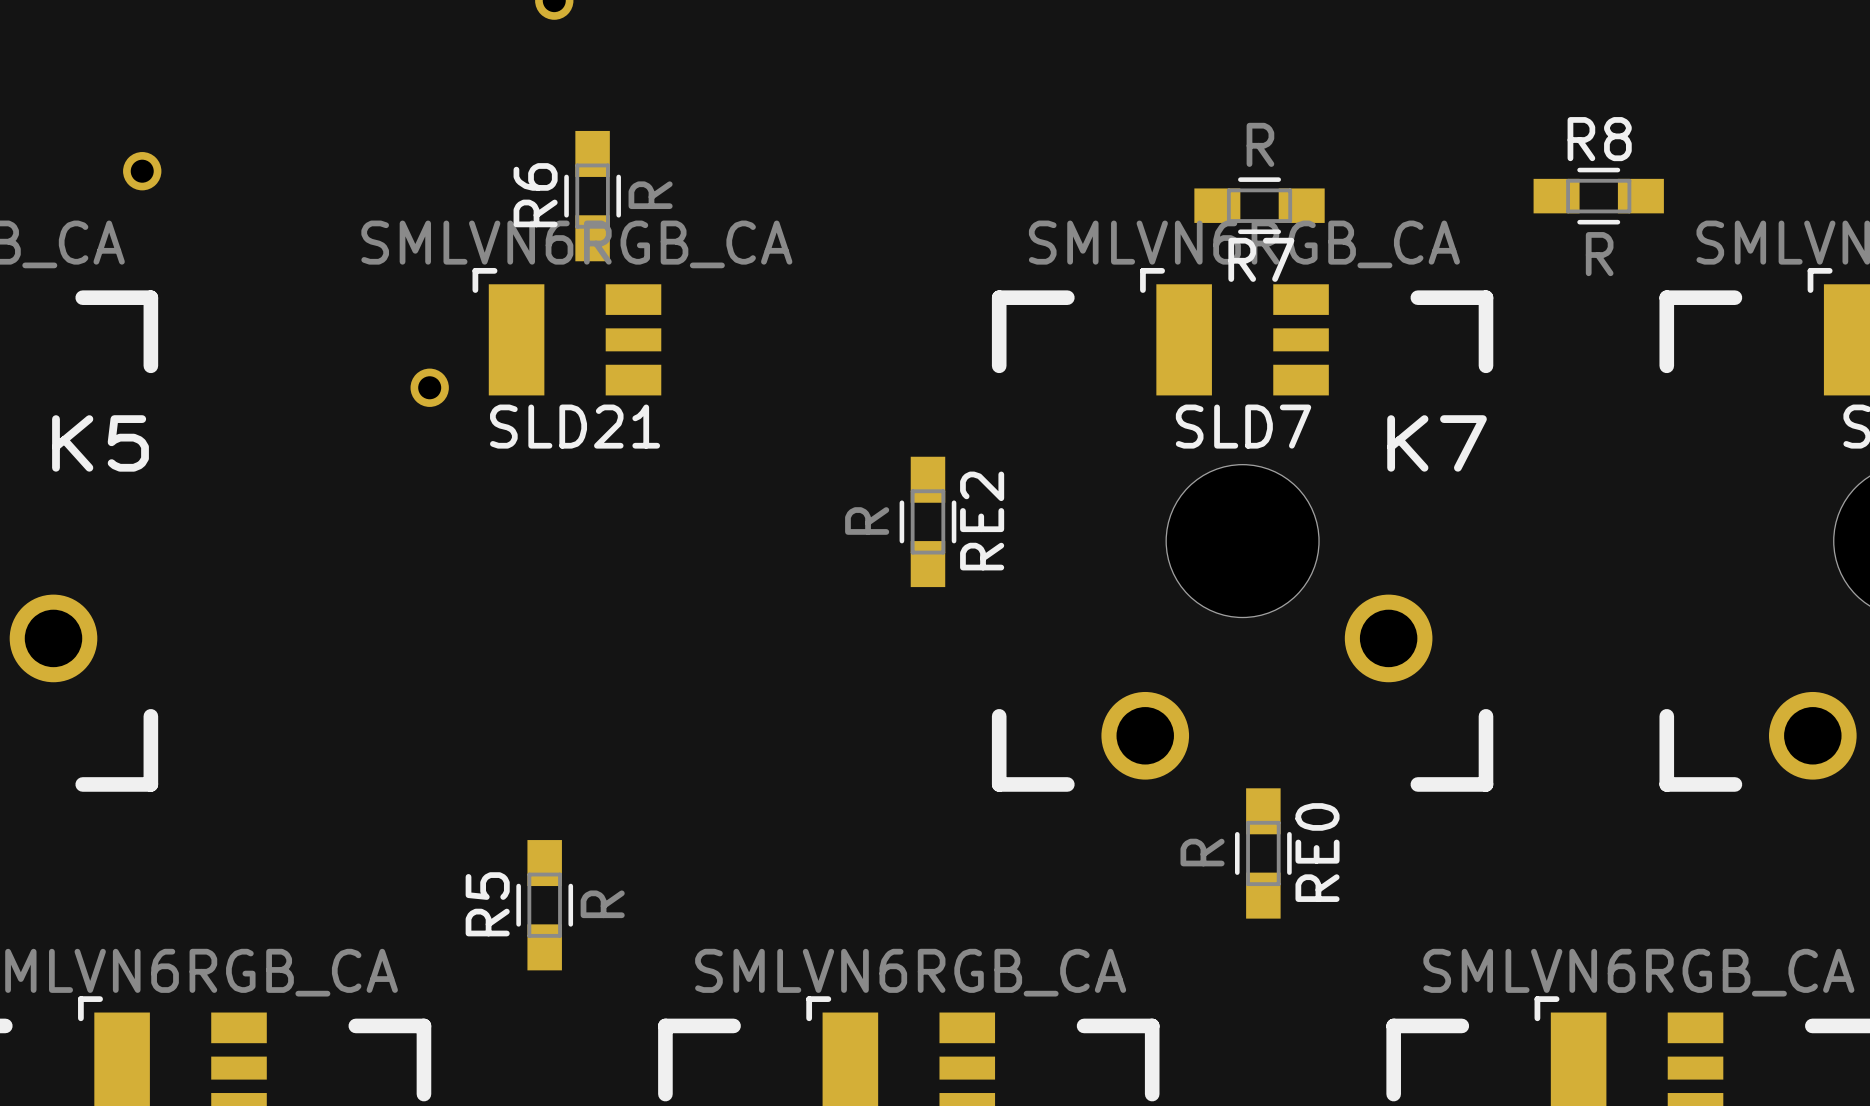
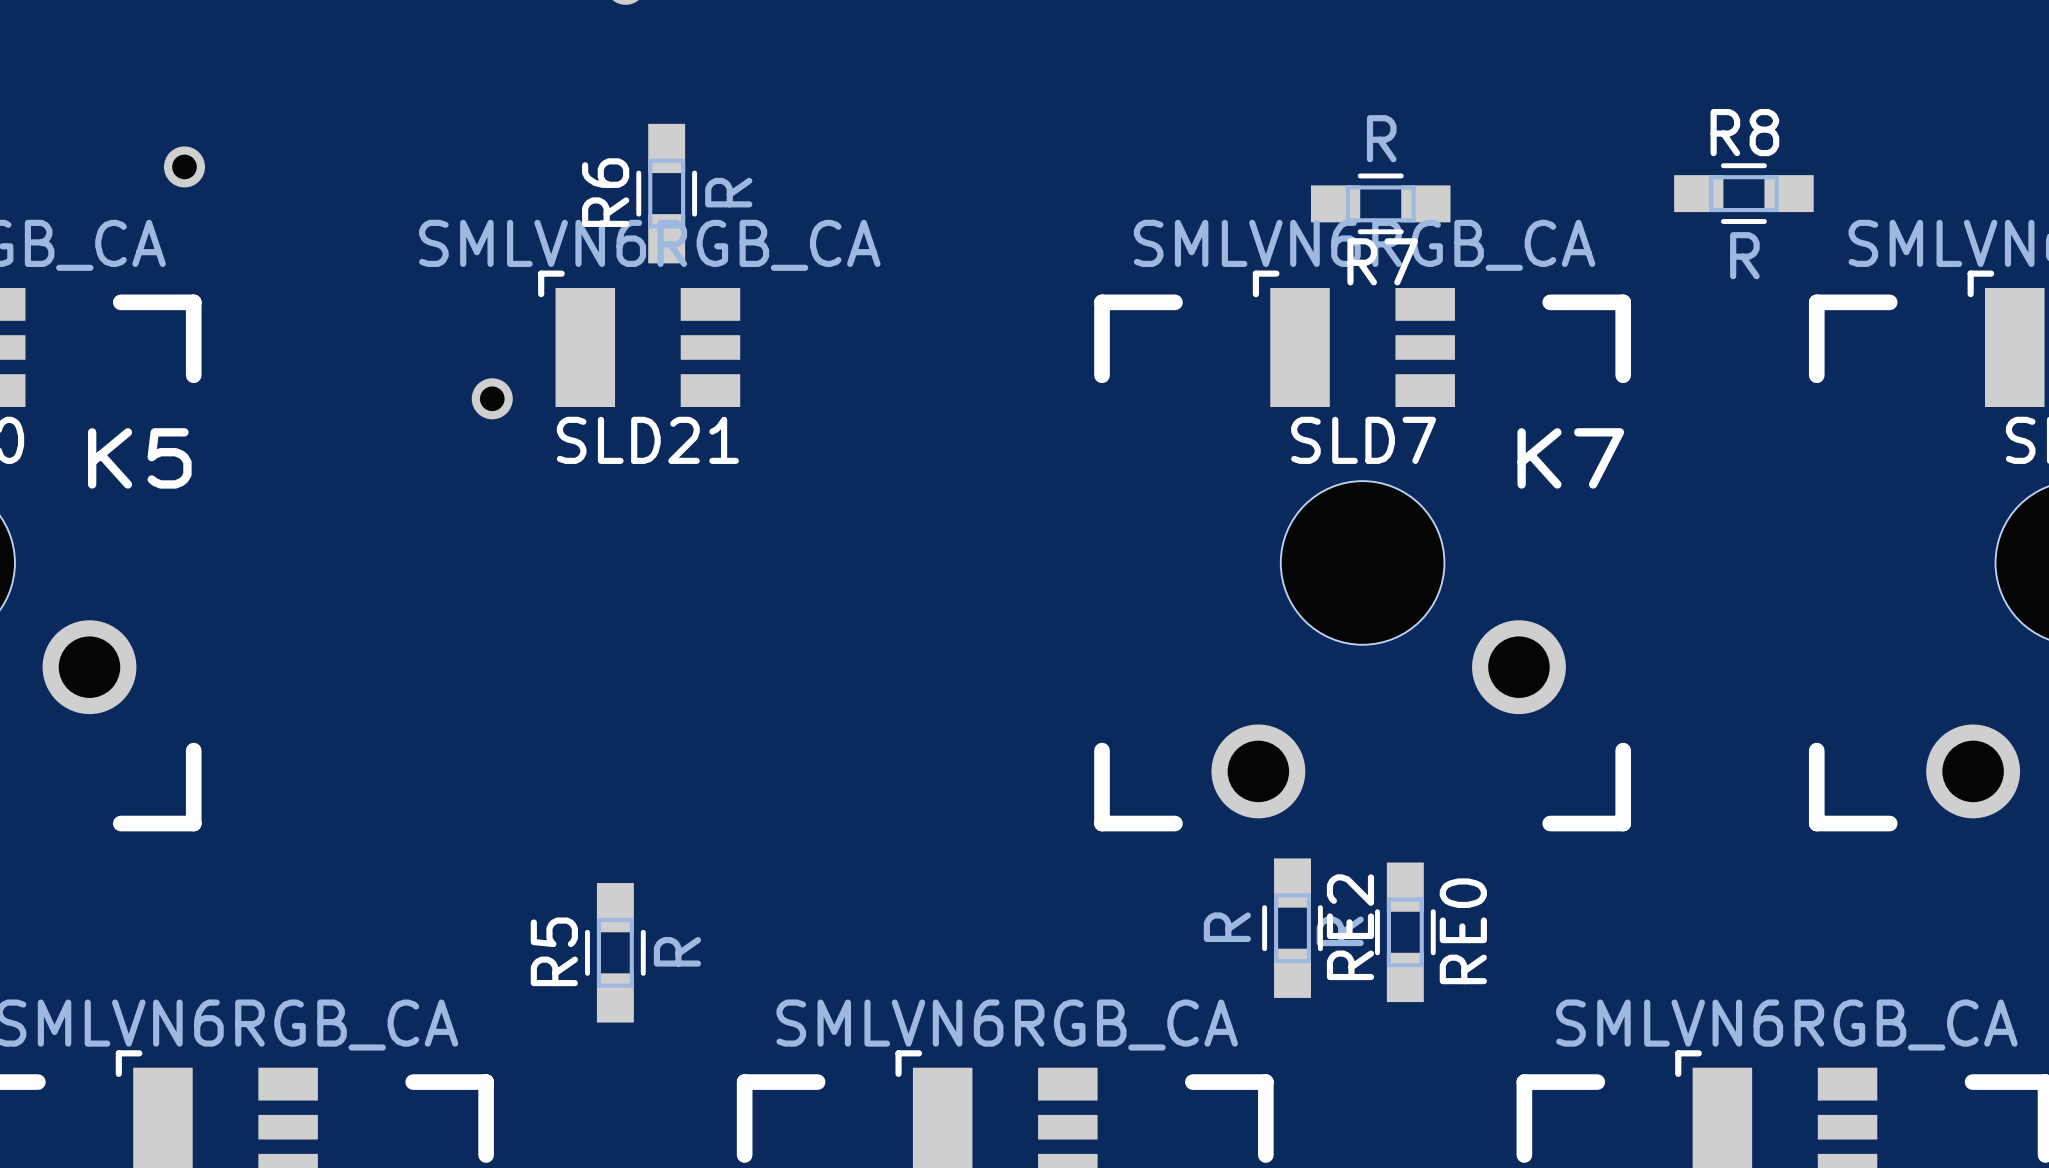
RE2 position: (927, 521) -> (1292, 928)
RE0 position: (1263, 853) -> (1405, 932)

